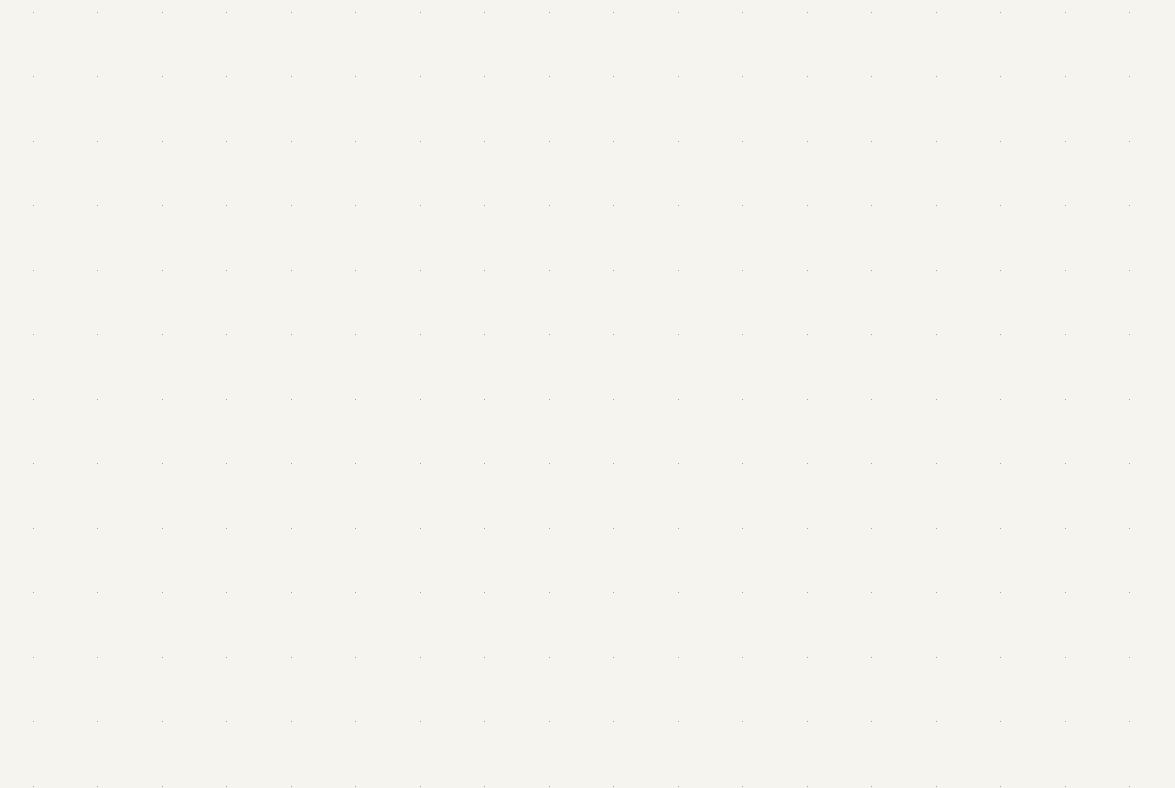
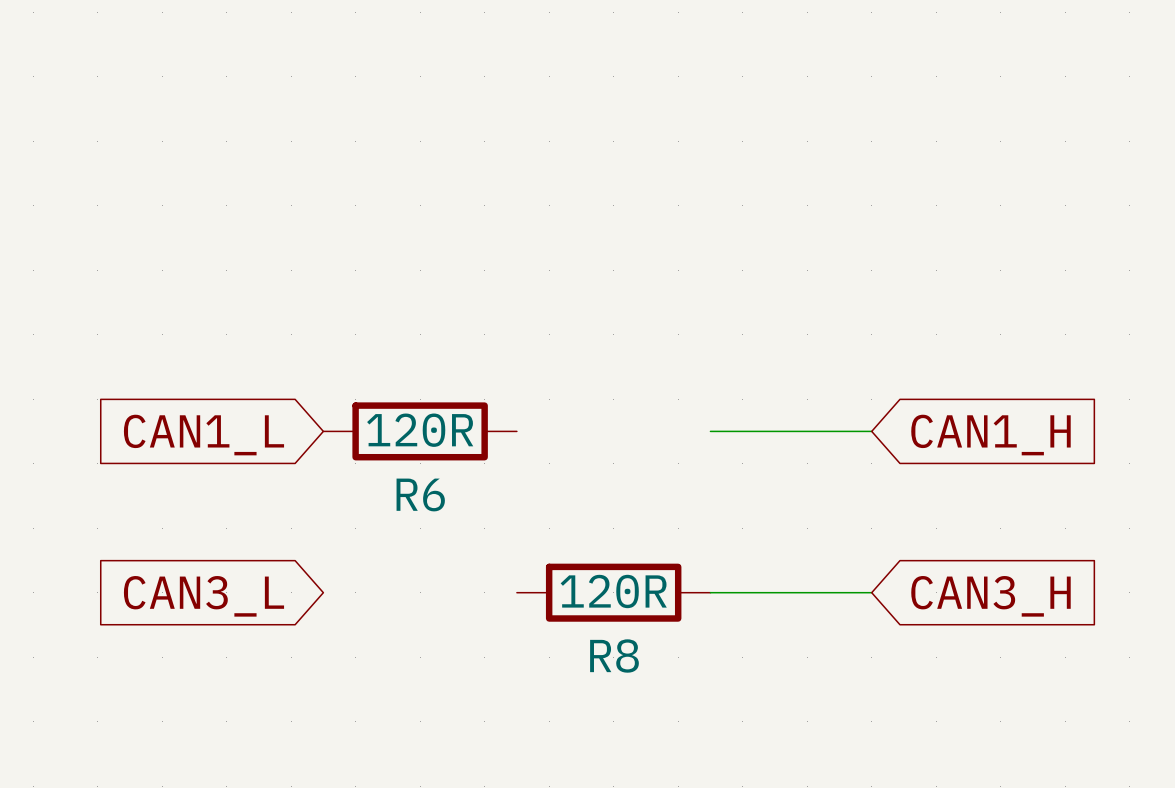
R6: none -> 120R (420, 431)
wire: none -> (710, 431) (871, 431)
global label: none -> CAN1_L (203, 435)
global label: none -> CAN1_H (990, 435)
R8: none -> 120R (613, 592)
wire: none -> (710, 592) (871, 592)
global label: none -> CAN3_L (203, 596)
global label: none -> CAN3_H (990, 596)

